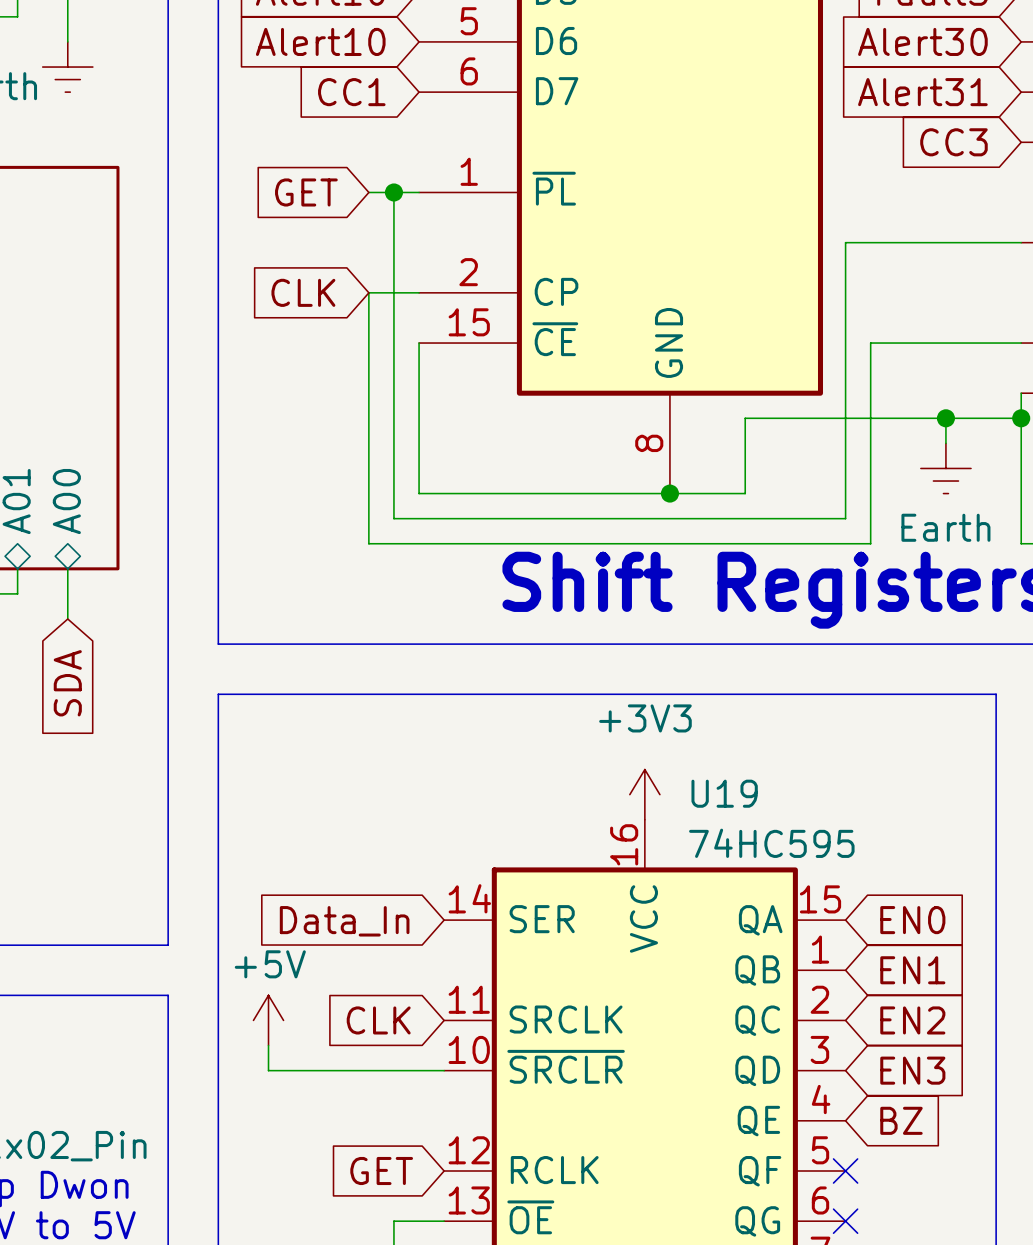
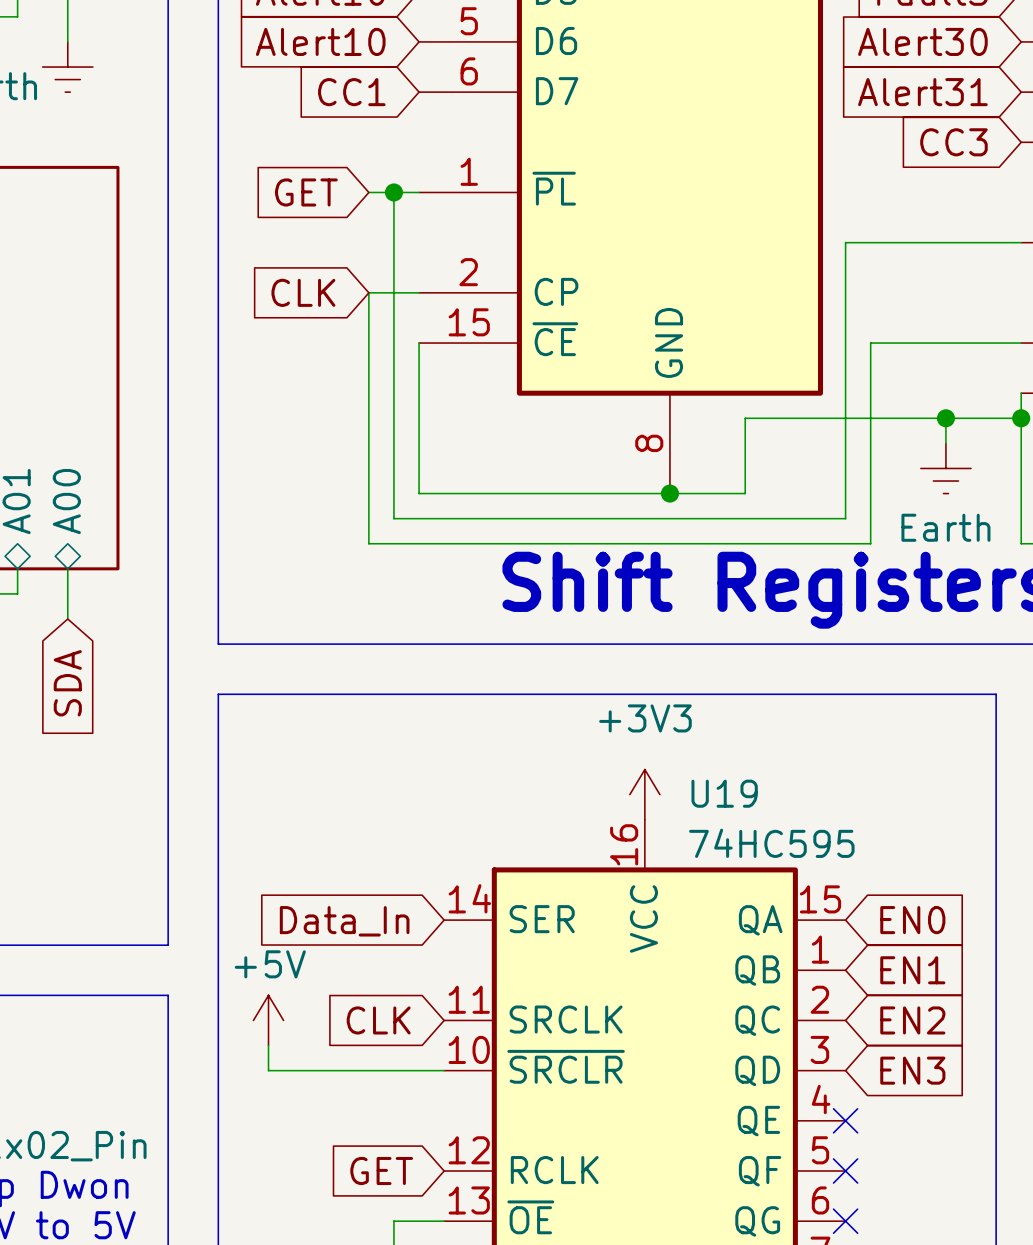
no-connect mark: none -> (845, 1120)
global label: BZ (901, 1120) -> none

